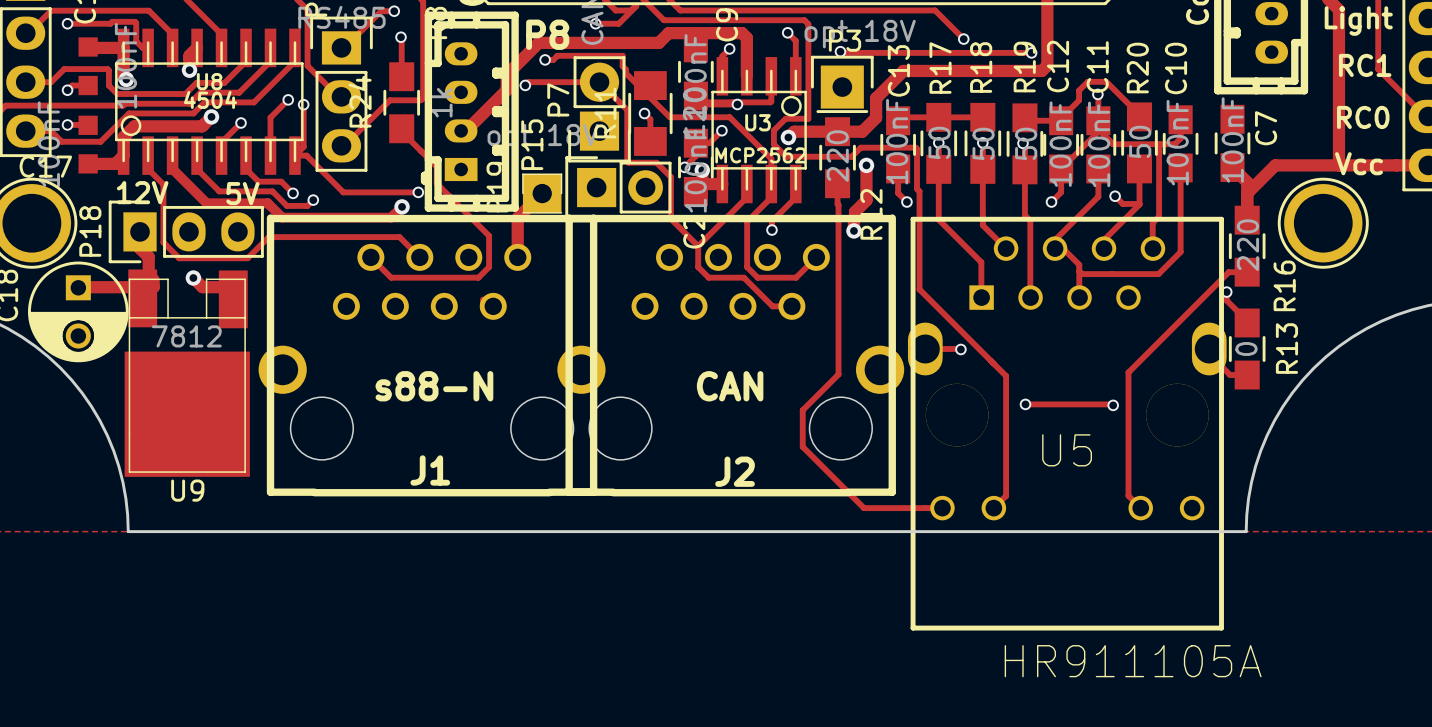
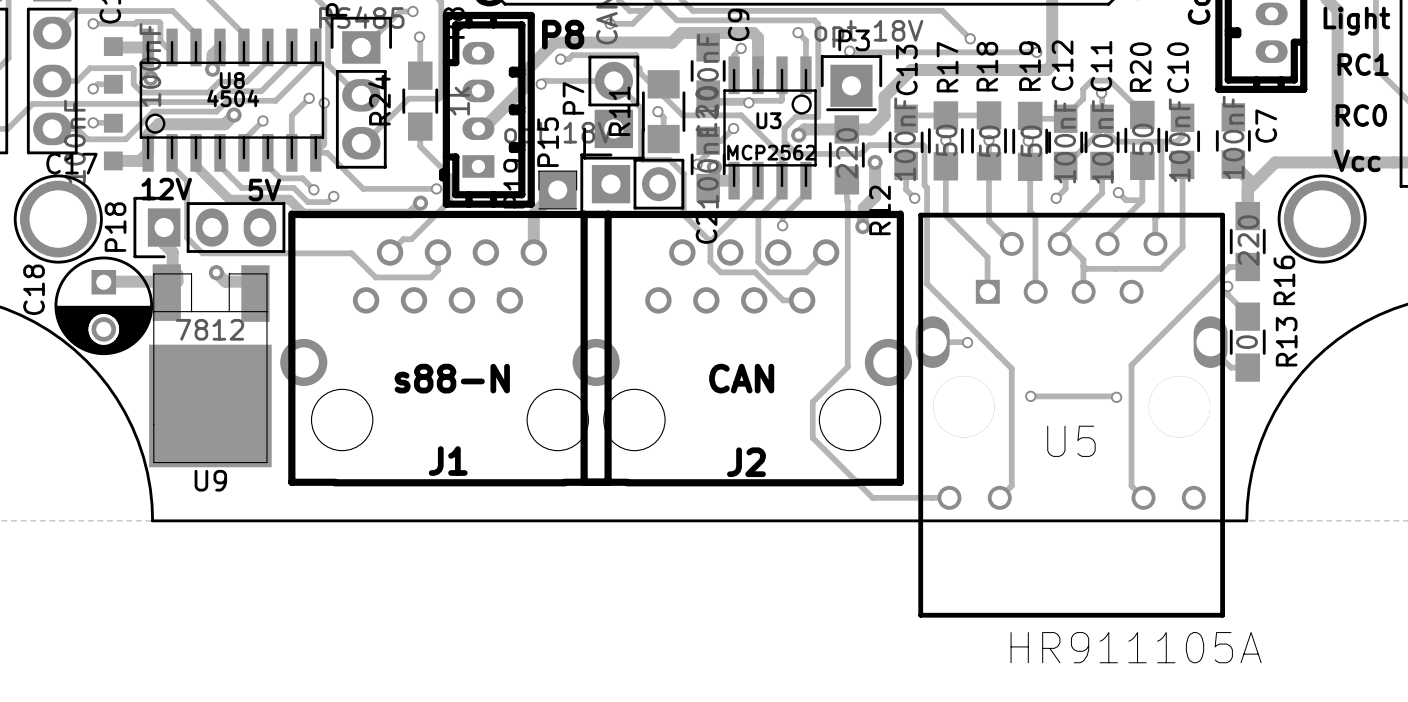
track: (401, 131) (436, 166) (436, 183) (489, 235) (489, 267) (478, 277) (391, 277) (370, 257) -> (420, 129) (420, 146) (449, 176) (449, 200) (411, 239) (403, 239) (390, 252)
track: (419, 257) (399, 237) (268, 237) (247, 258) -> (437, 252) (437, 270) (430, 277) (375, 277) (351, 253) (269, 253)

